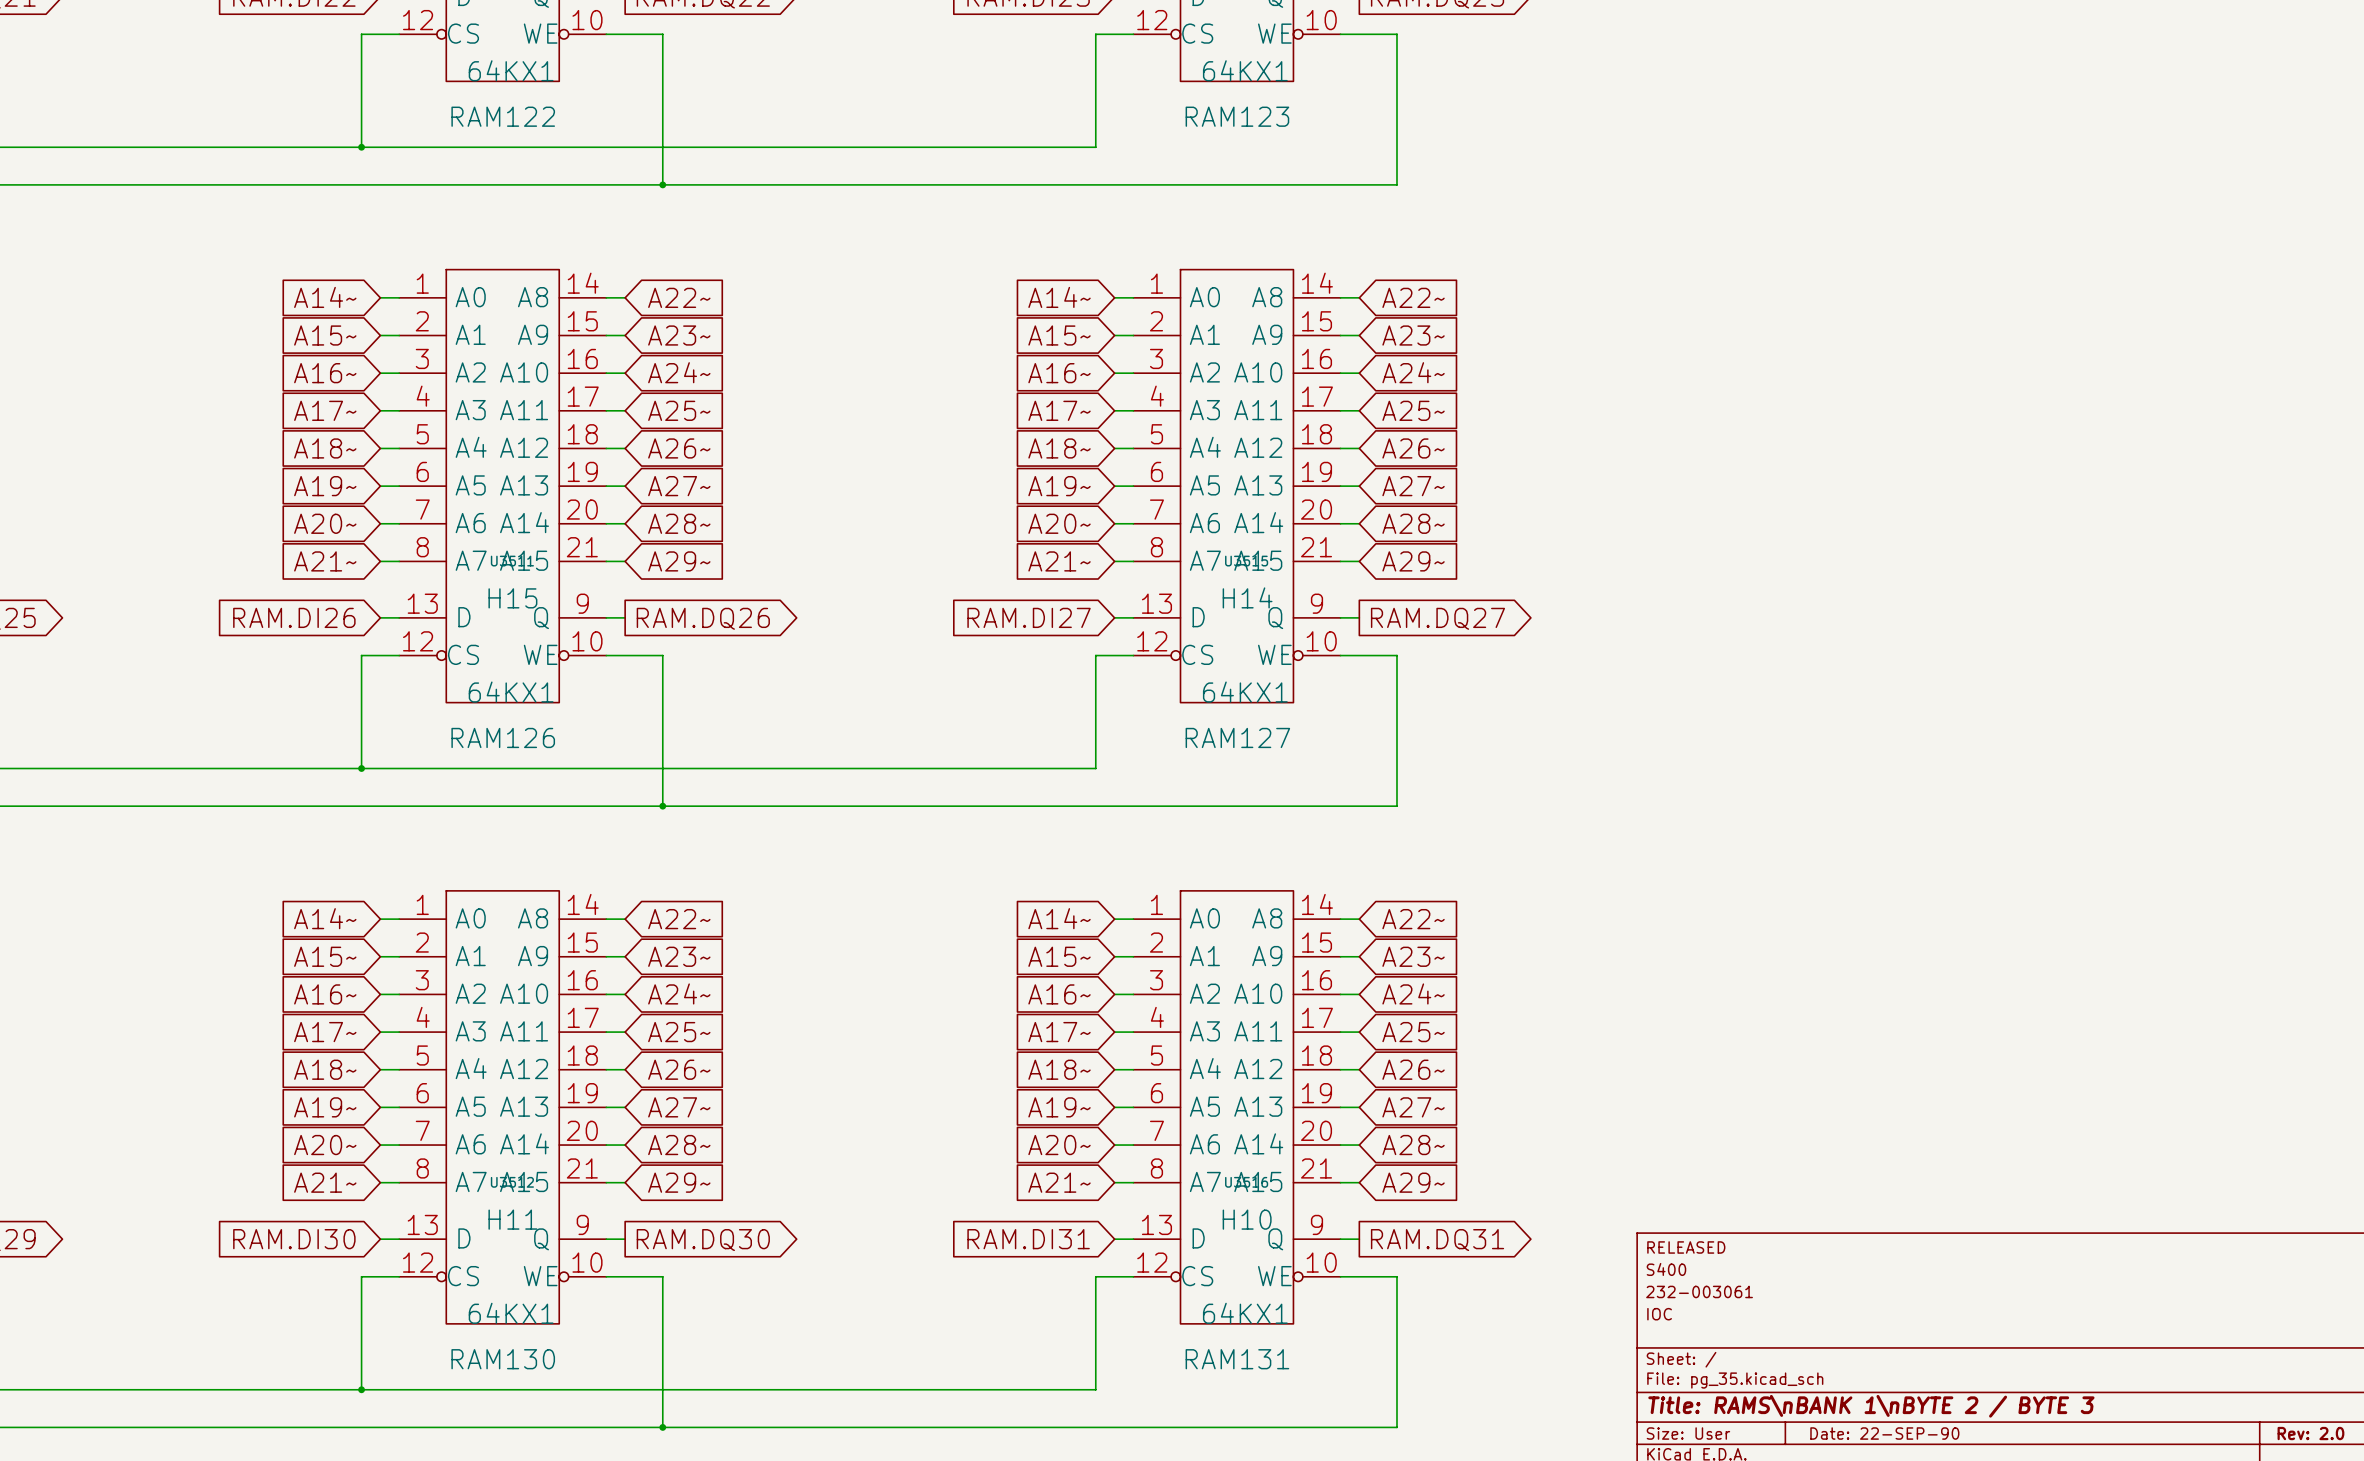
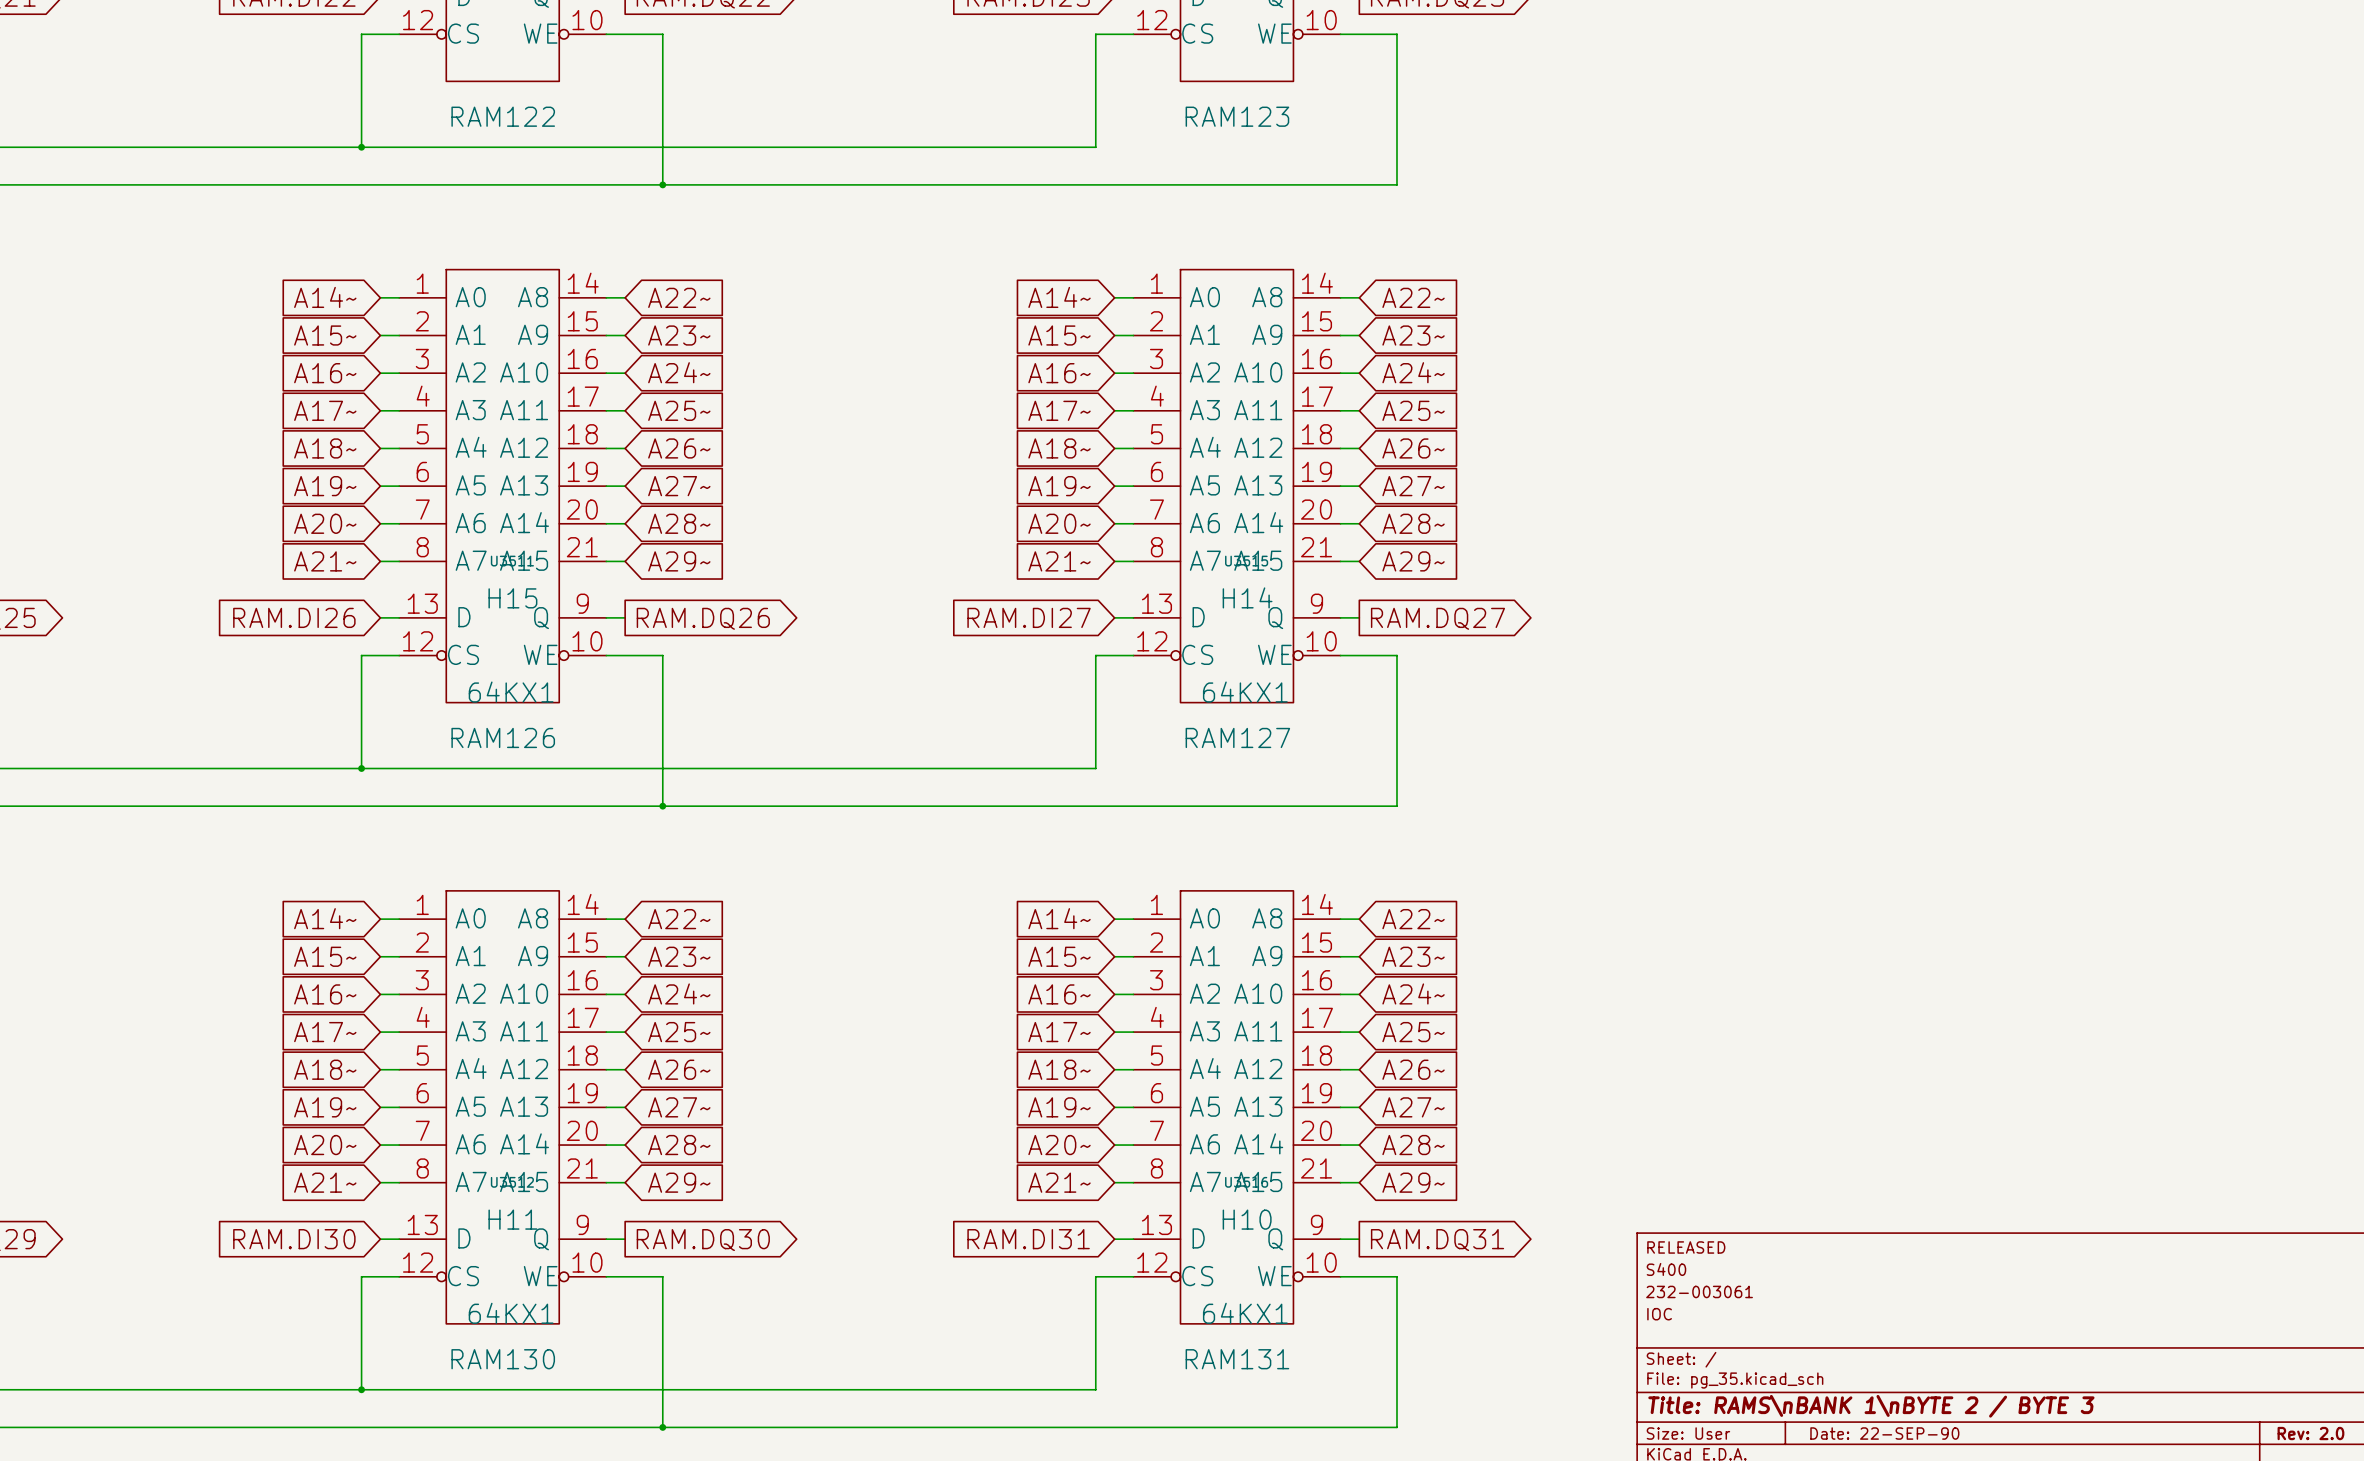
part value: 64KX1 (511, 70) -> none
part value: 64KX1 (1245, 70) -> none

